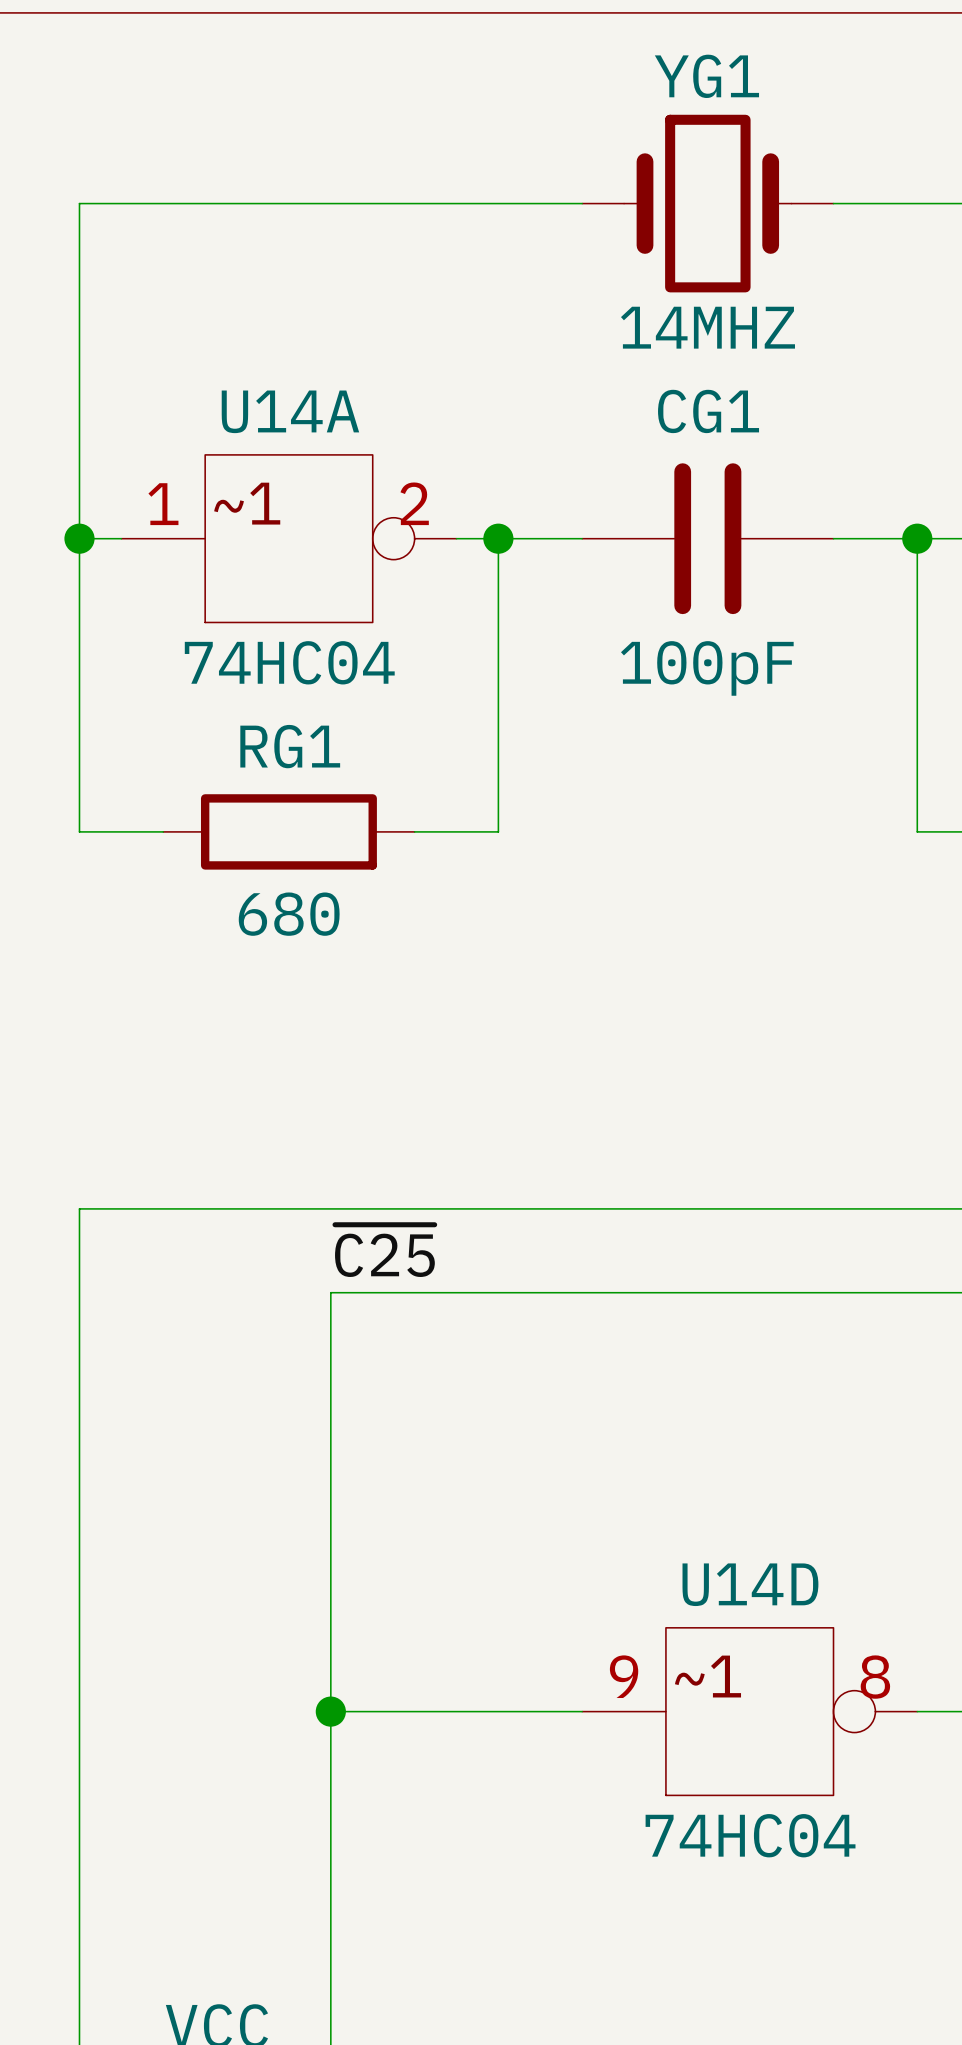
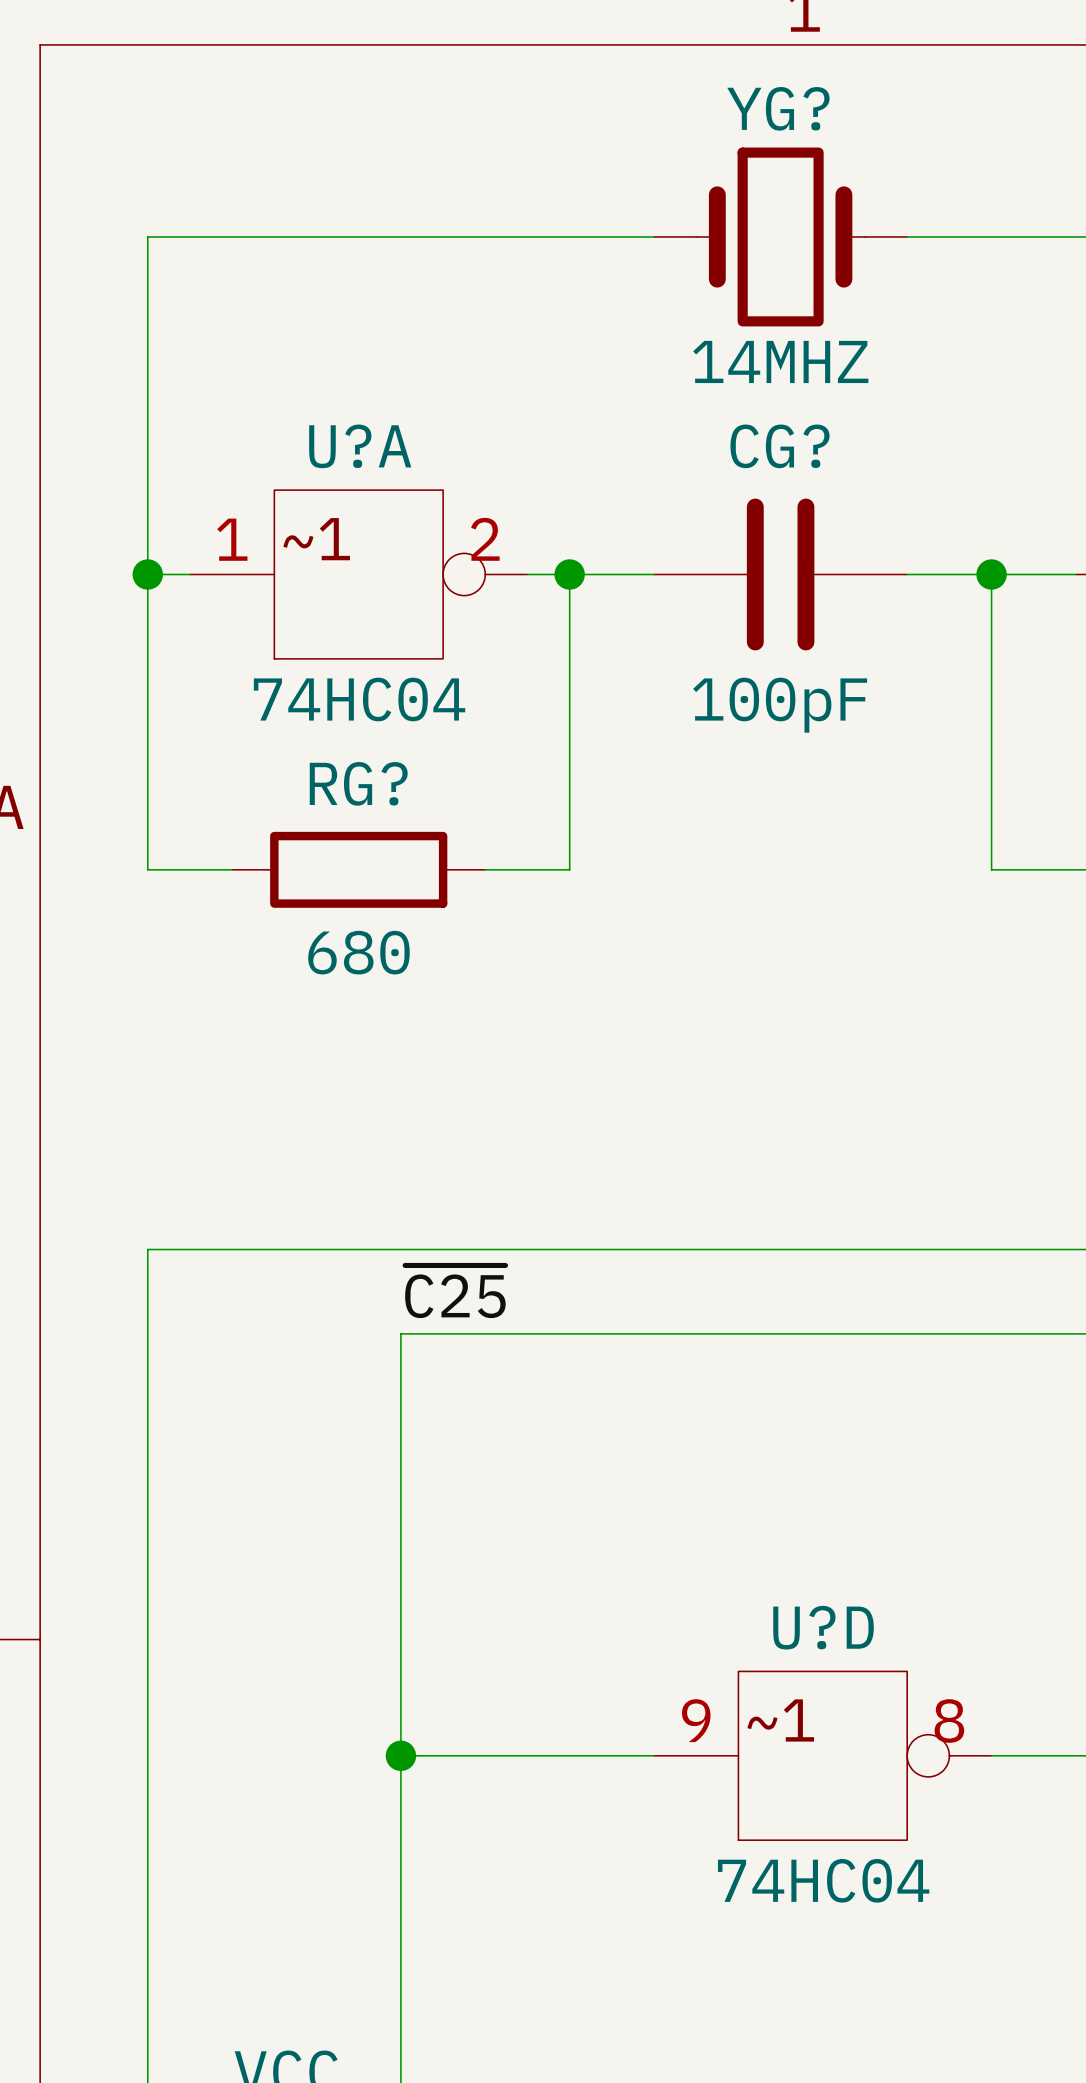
YG1 name: YG1 (706, 76) -> YG? (778, 108)
U14A name: U14A (290, 411) -> U?A (360, 446)
CG1 name: CG1 (708, 411) -> CG? (780, 446)
RG1 name: RG1 (290, 746) -> RG? (358, 783)
U14D name: U14D (750, 1584) -> U?D (823, 1627)

